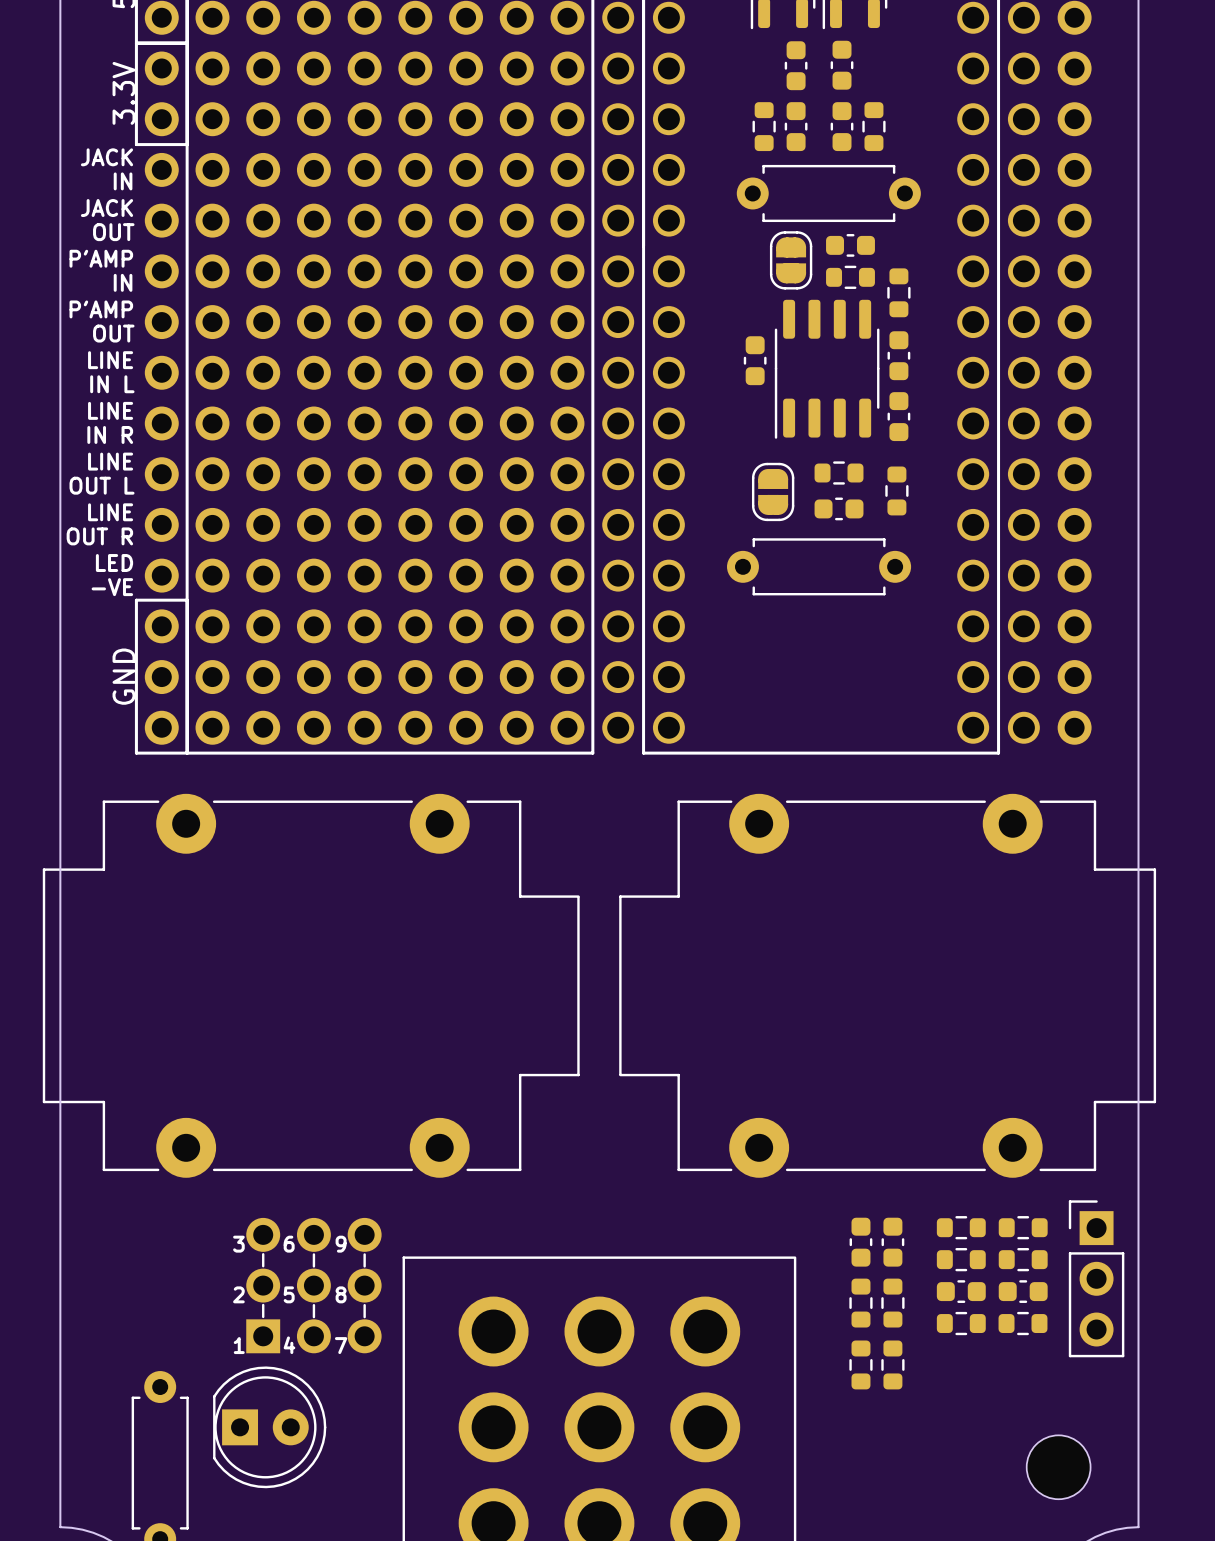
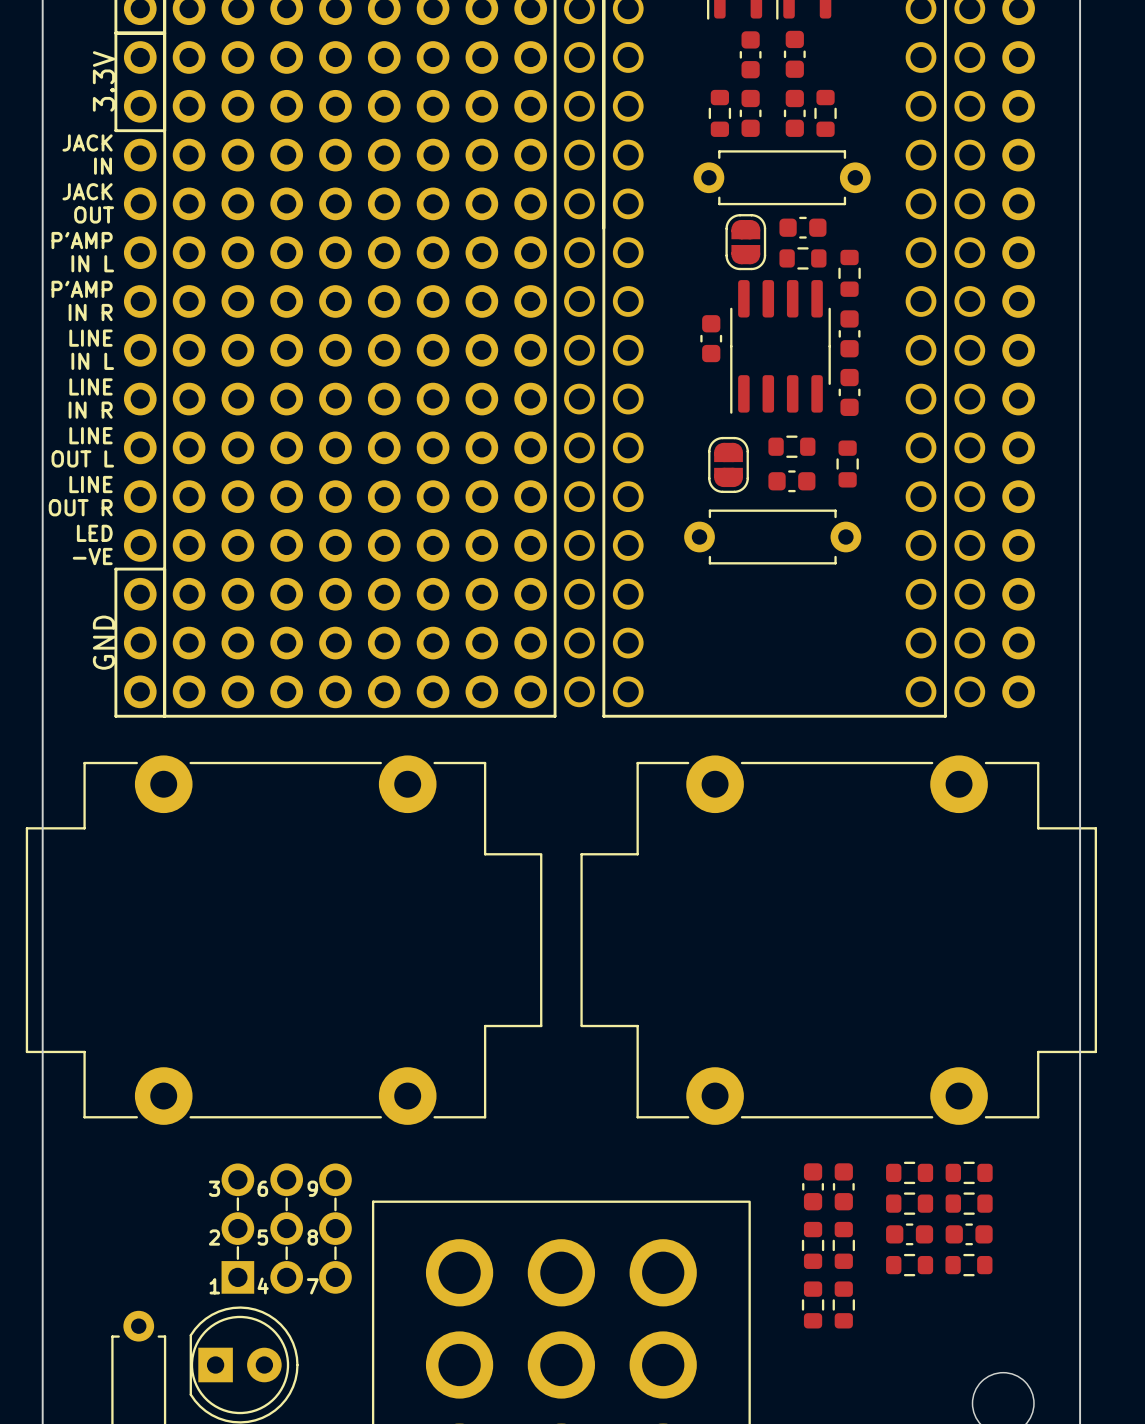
text: IN (123, 282) -> IN L (92, 263)
text: OUT (113, 333) -> IN R (90, 312)
part: (1096, 1278) -> none

